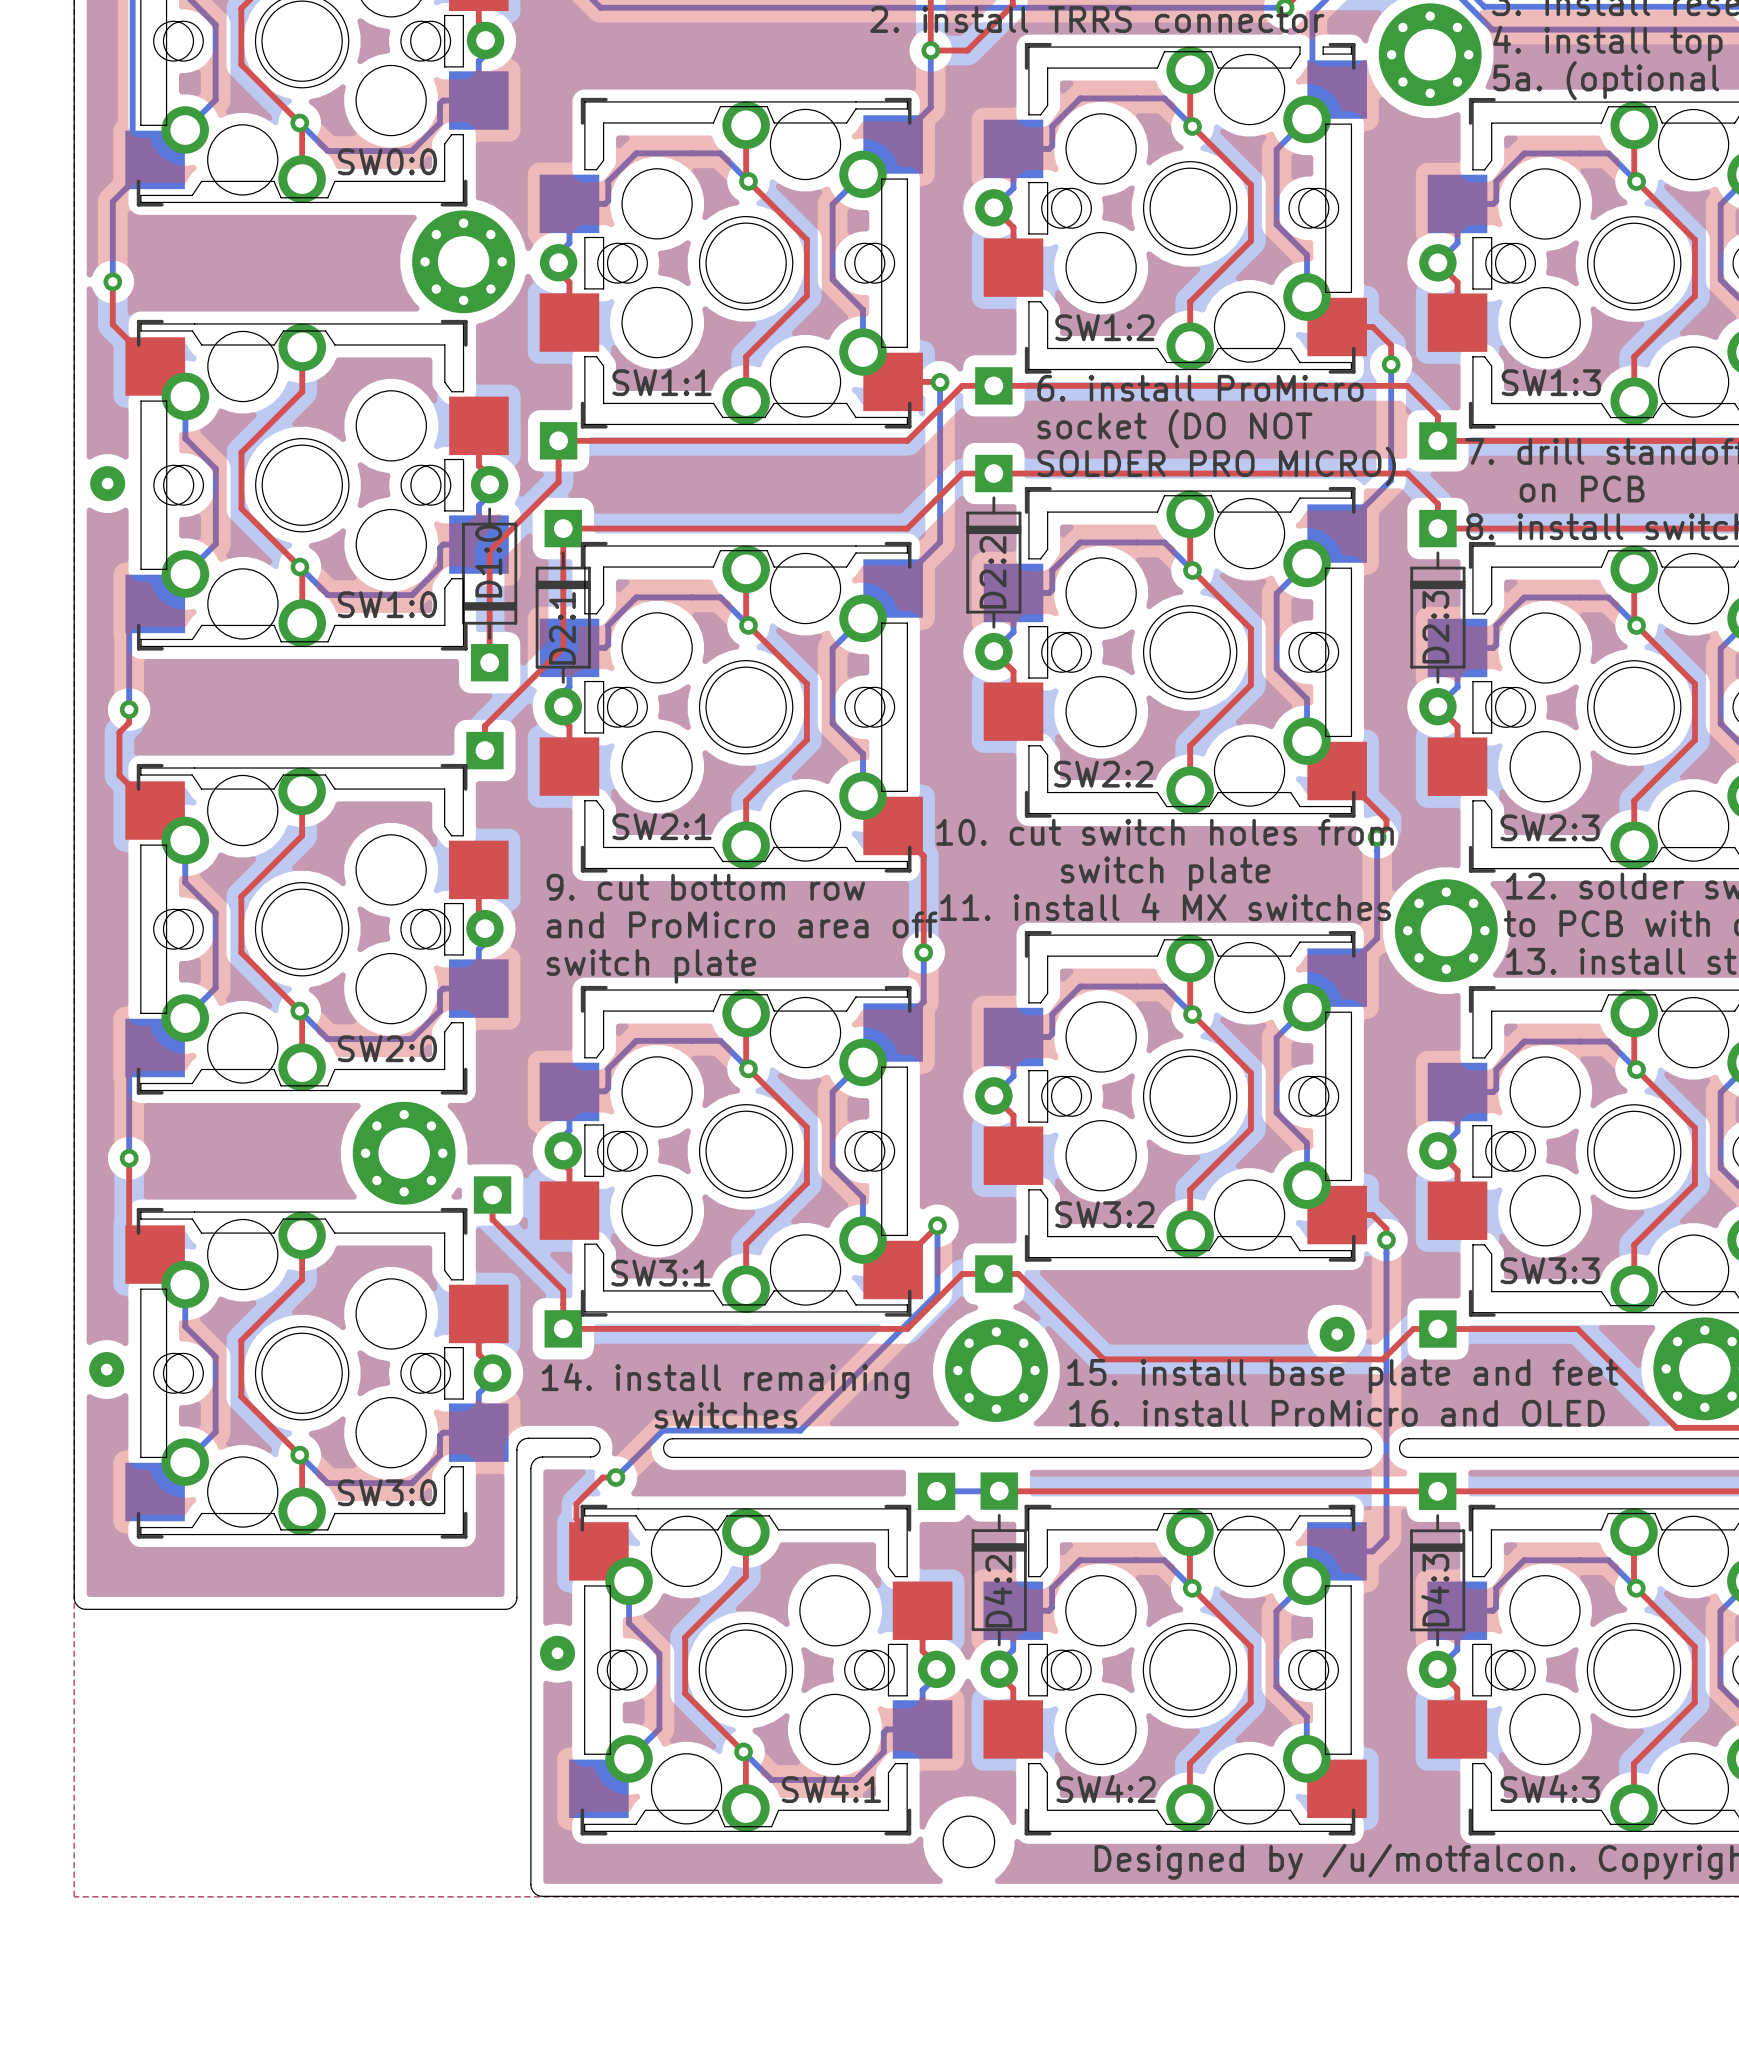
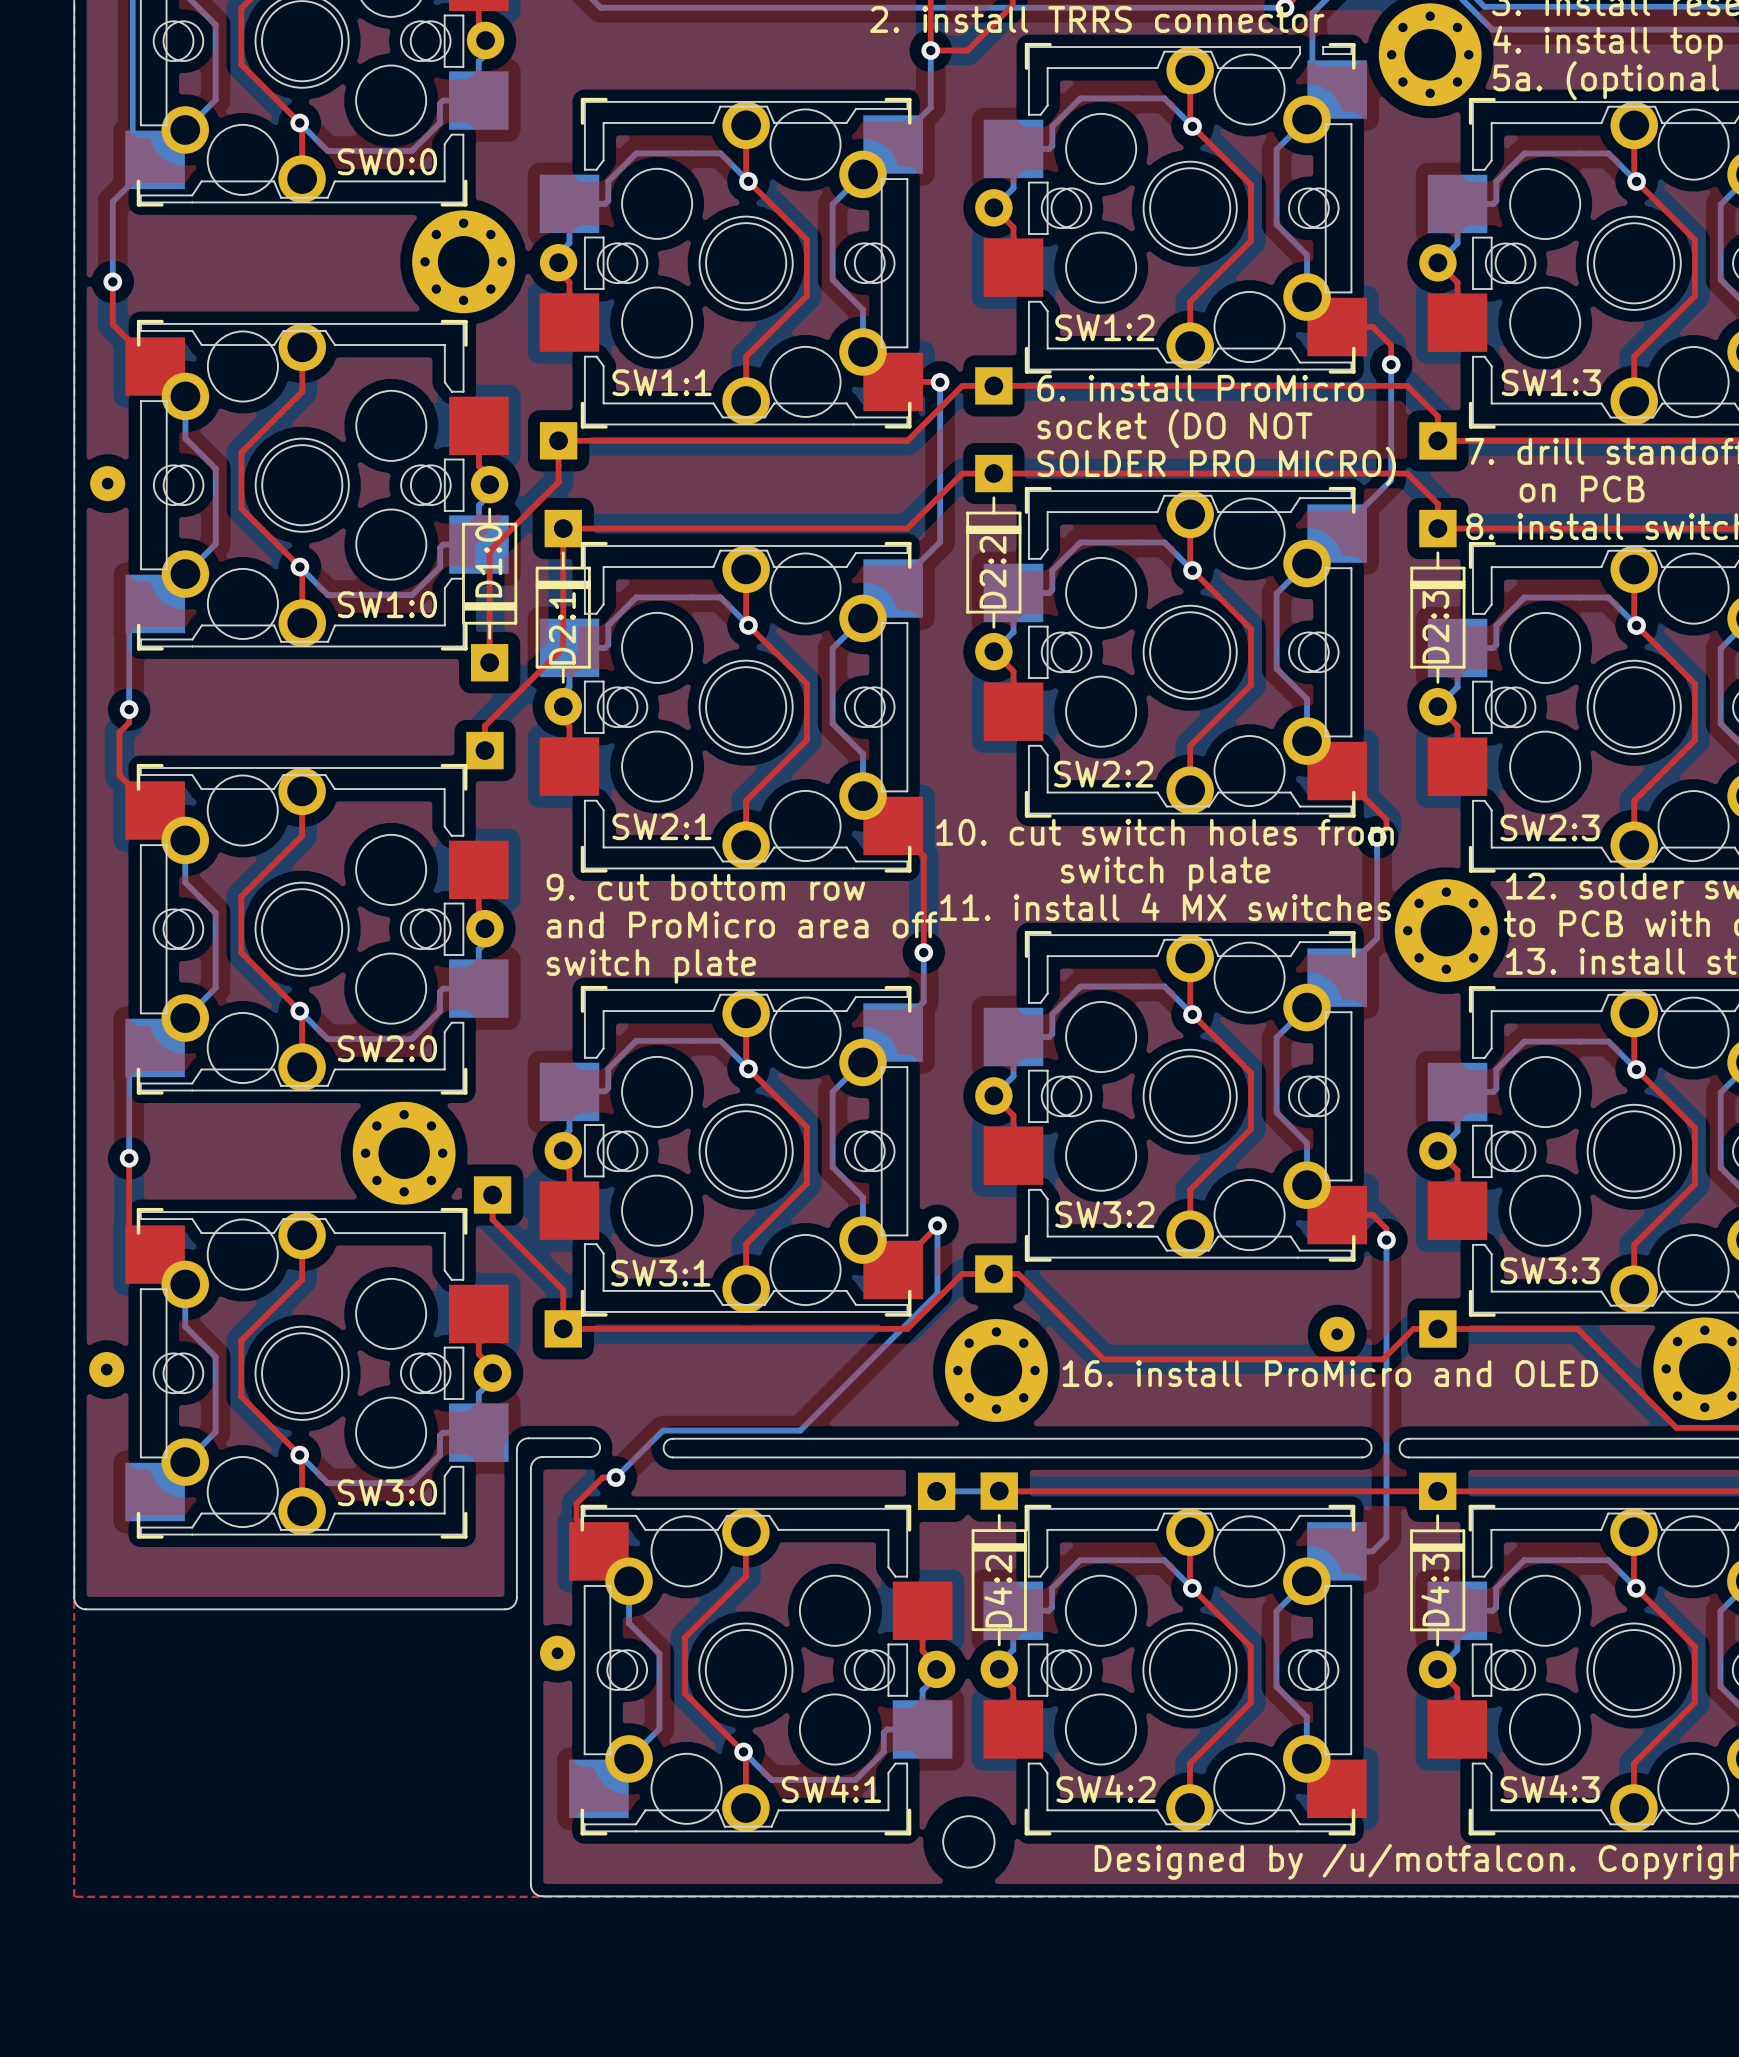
text: 15. install base plate and feet (1342, 1376) -> 16. install ProMicro and OLED (1330, 1373)
text: 14. install remaining (725, 1381) -> none
text: 16. install ProMicro and OLED (1336, 1413) -> none
text: switches (726, 1415) -> none

